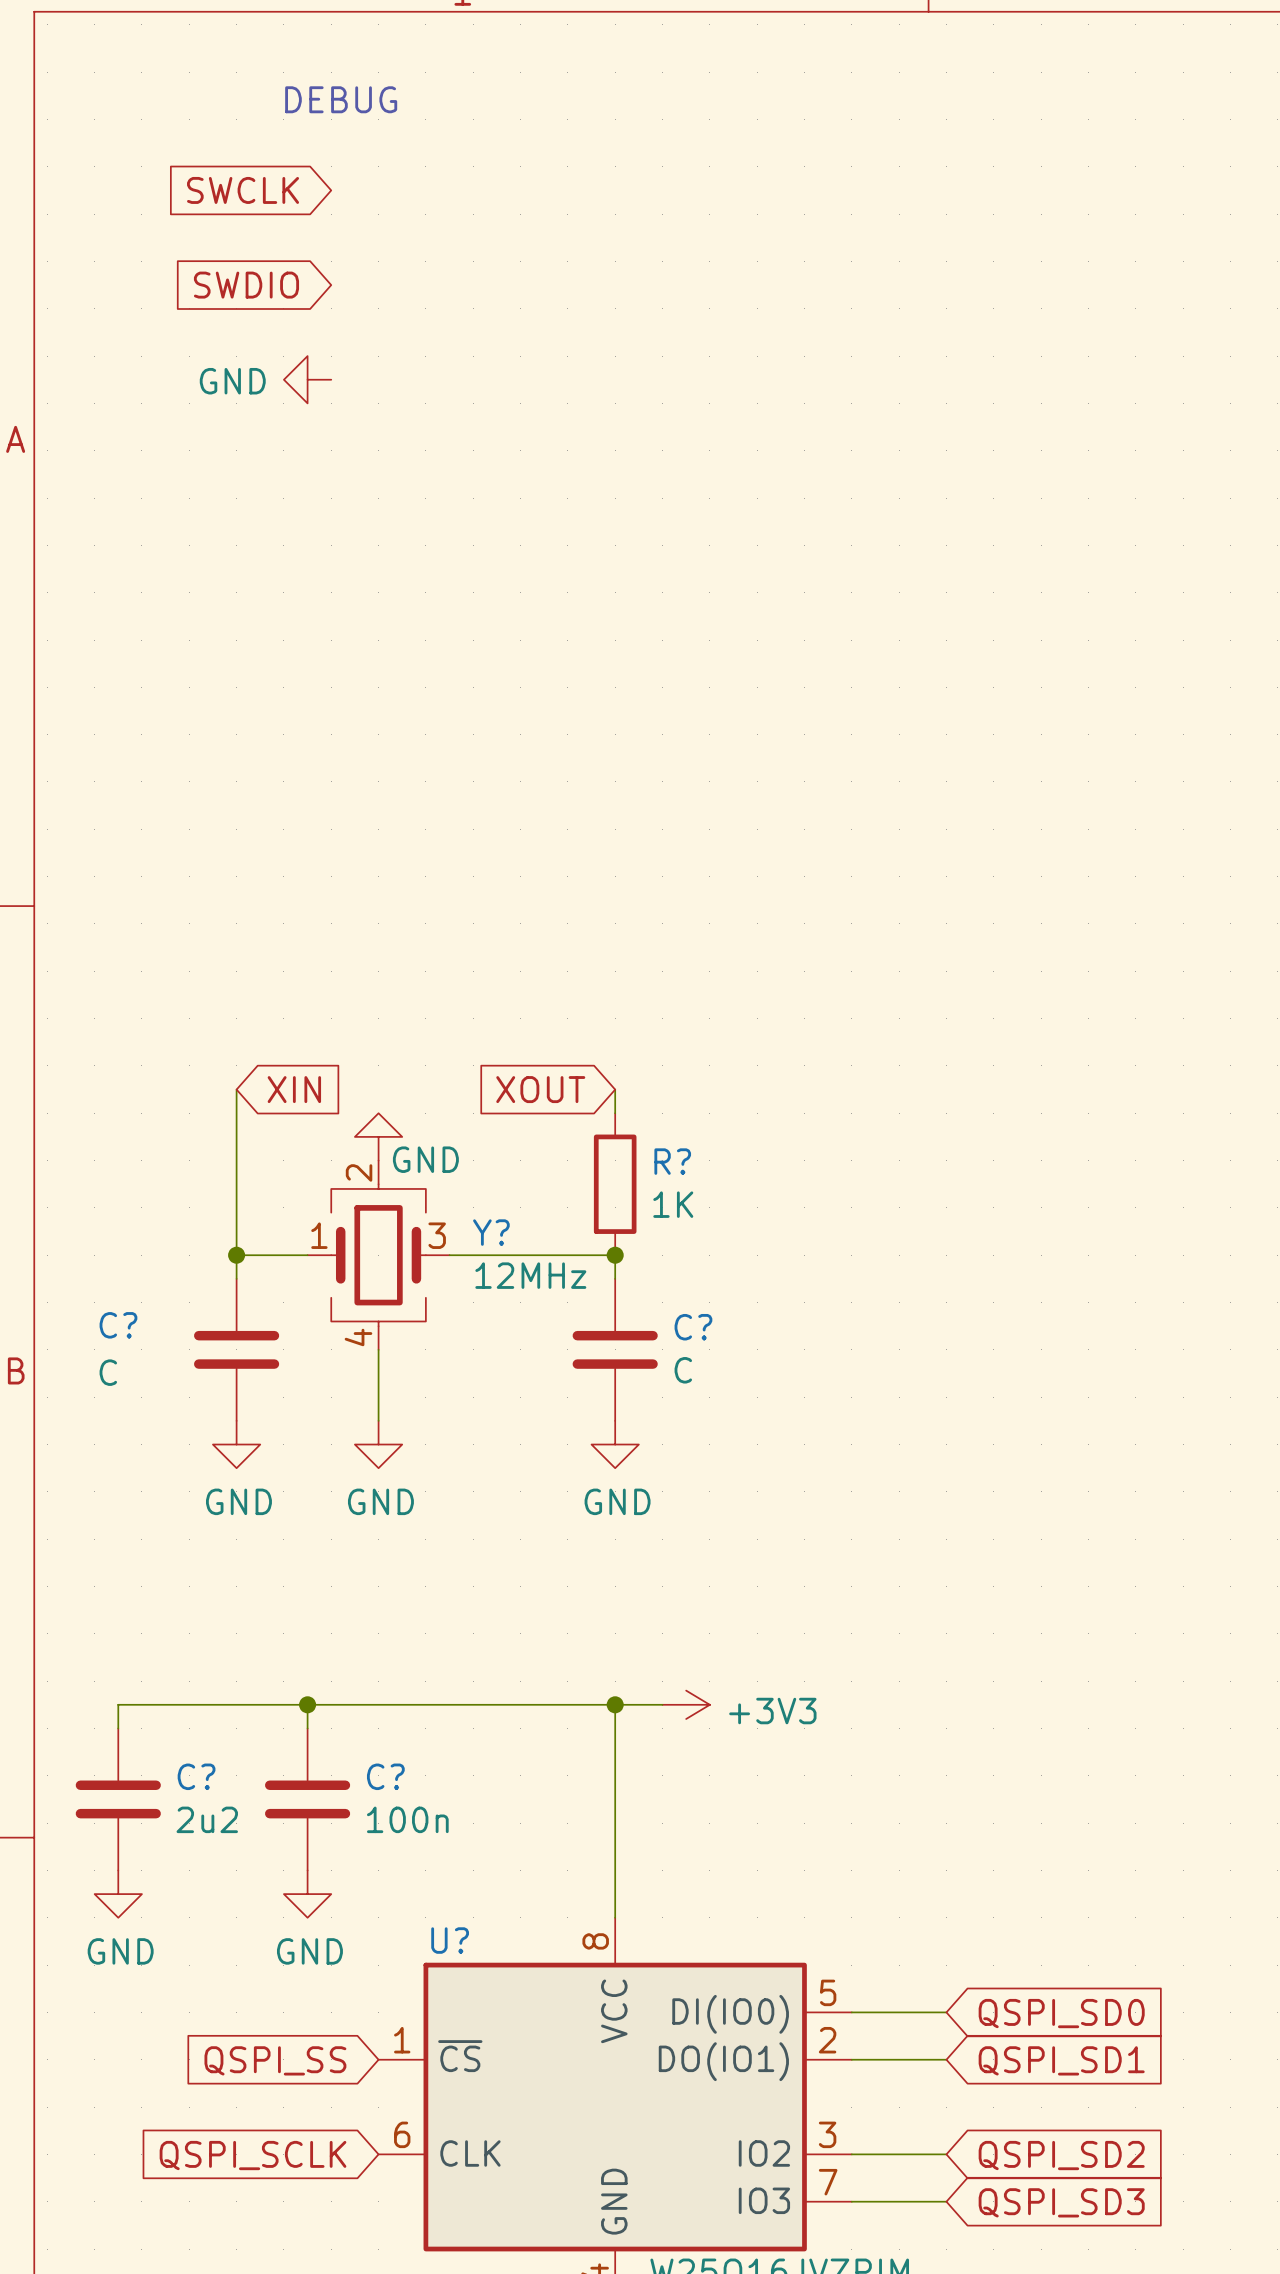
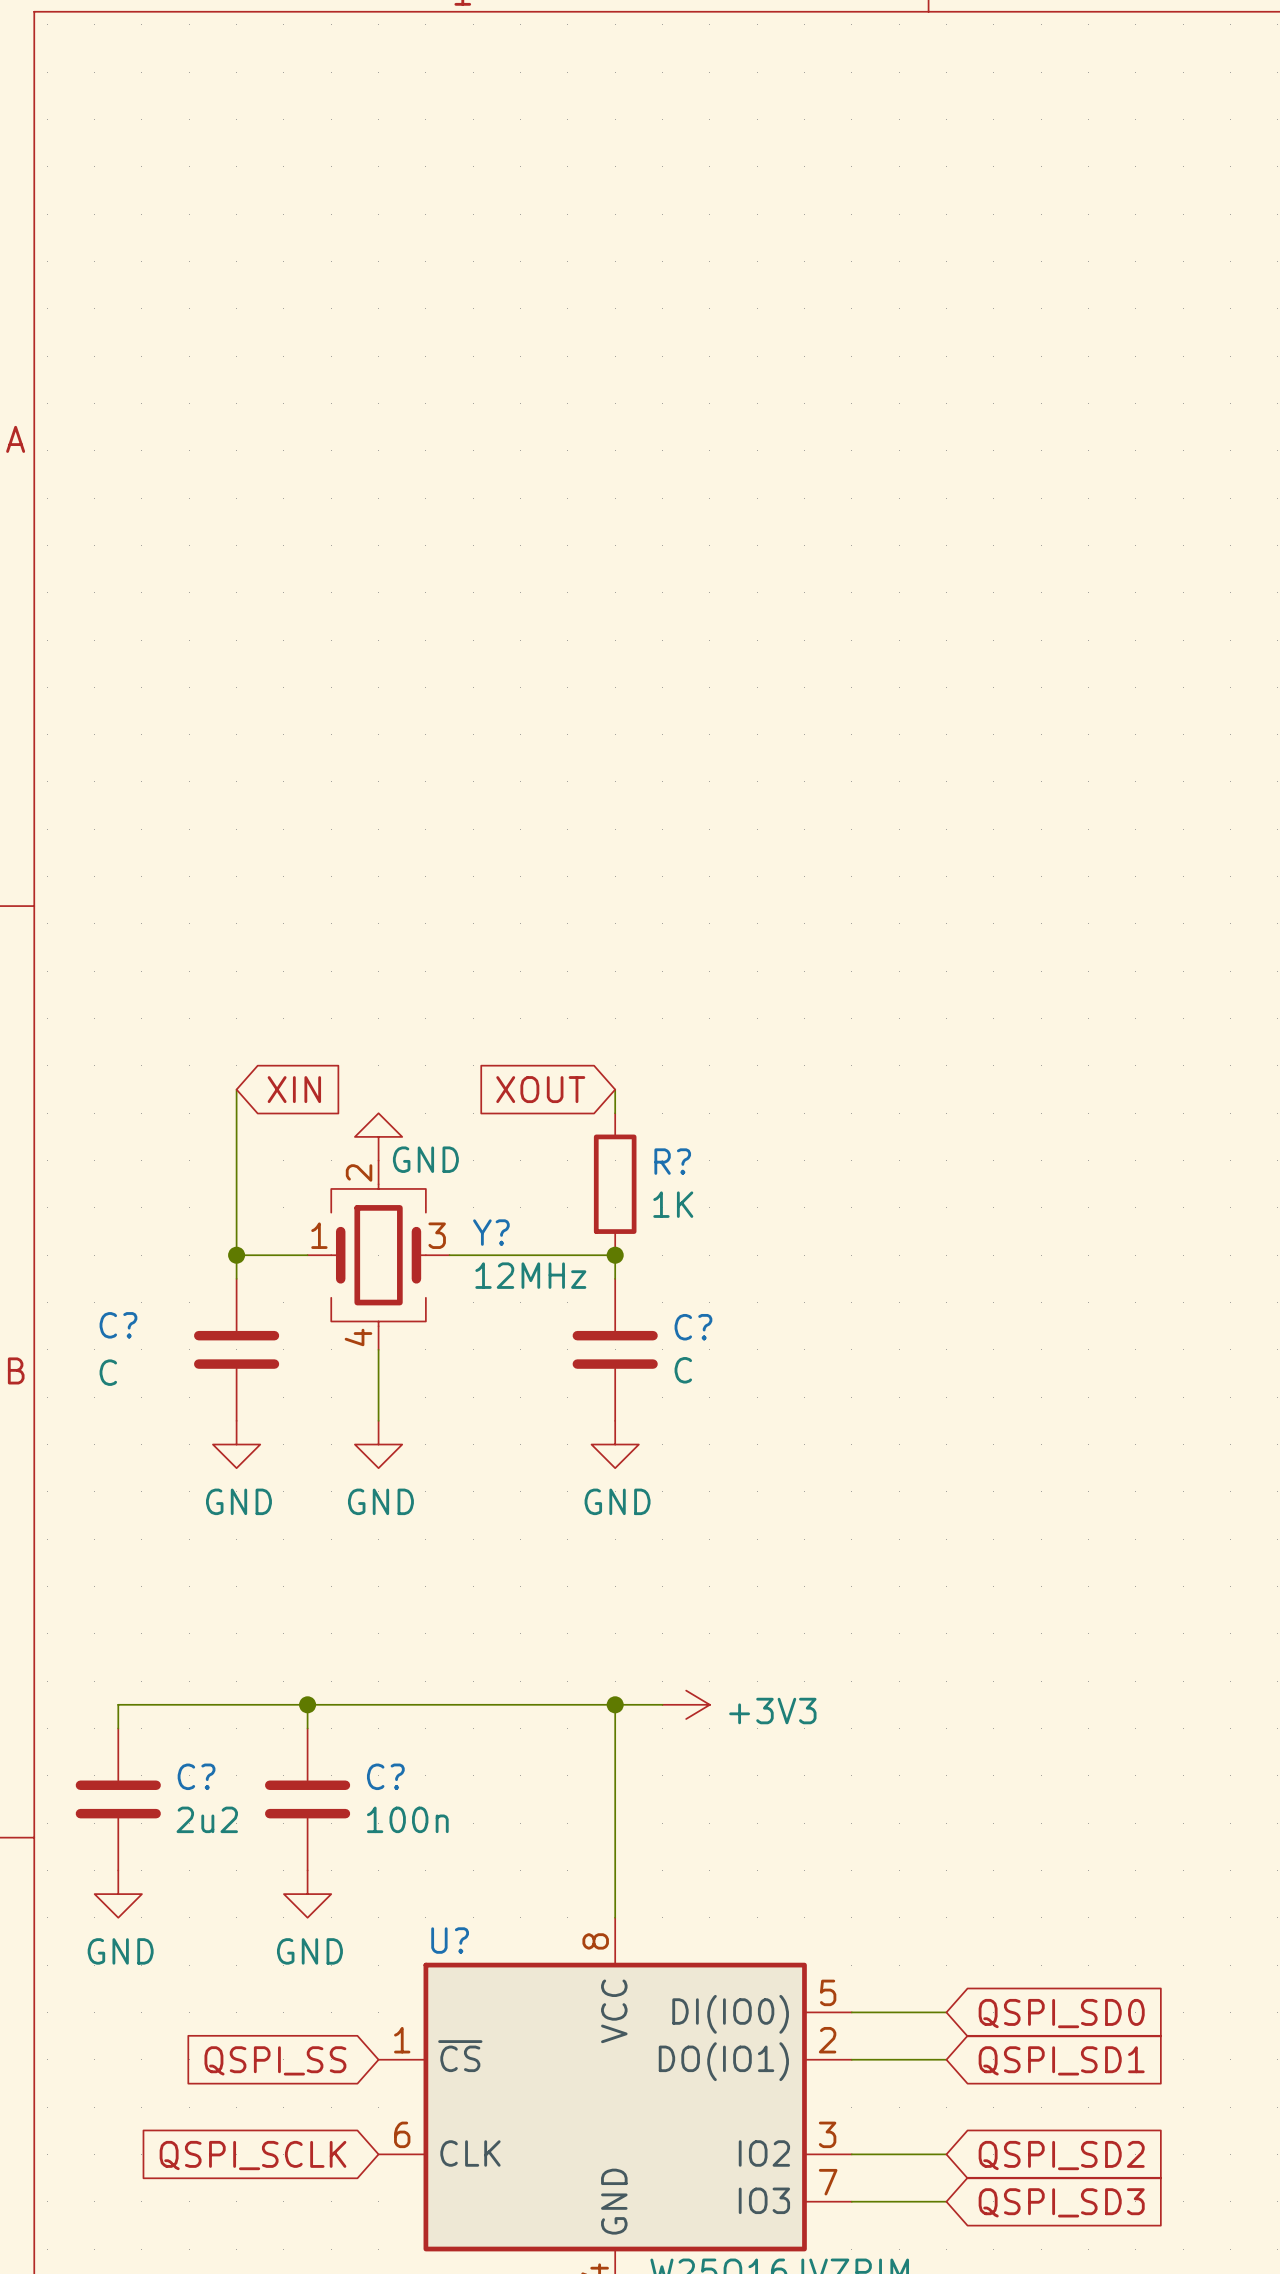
text: DEBUG (341, 99) -> none
global label: SWCLK (243, 190) -> none
global label: SWDIO (246, 285) -> none
power symbol: GND (307, 379) -> none

